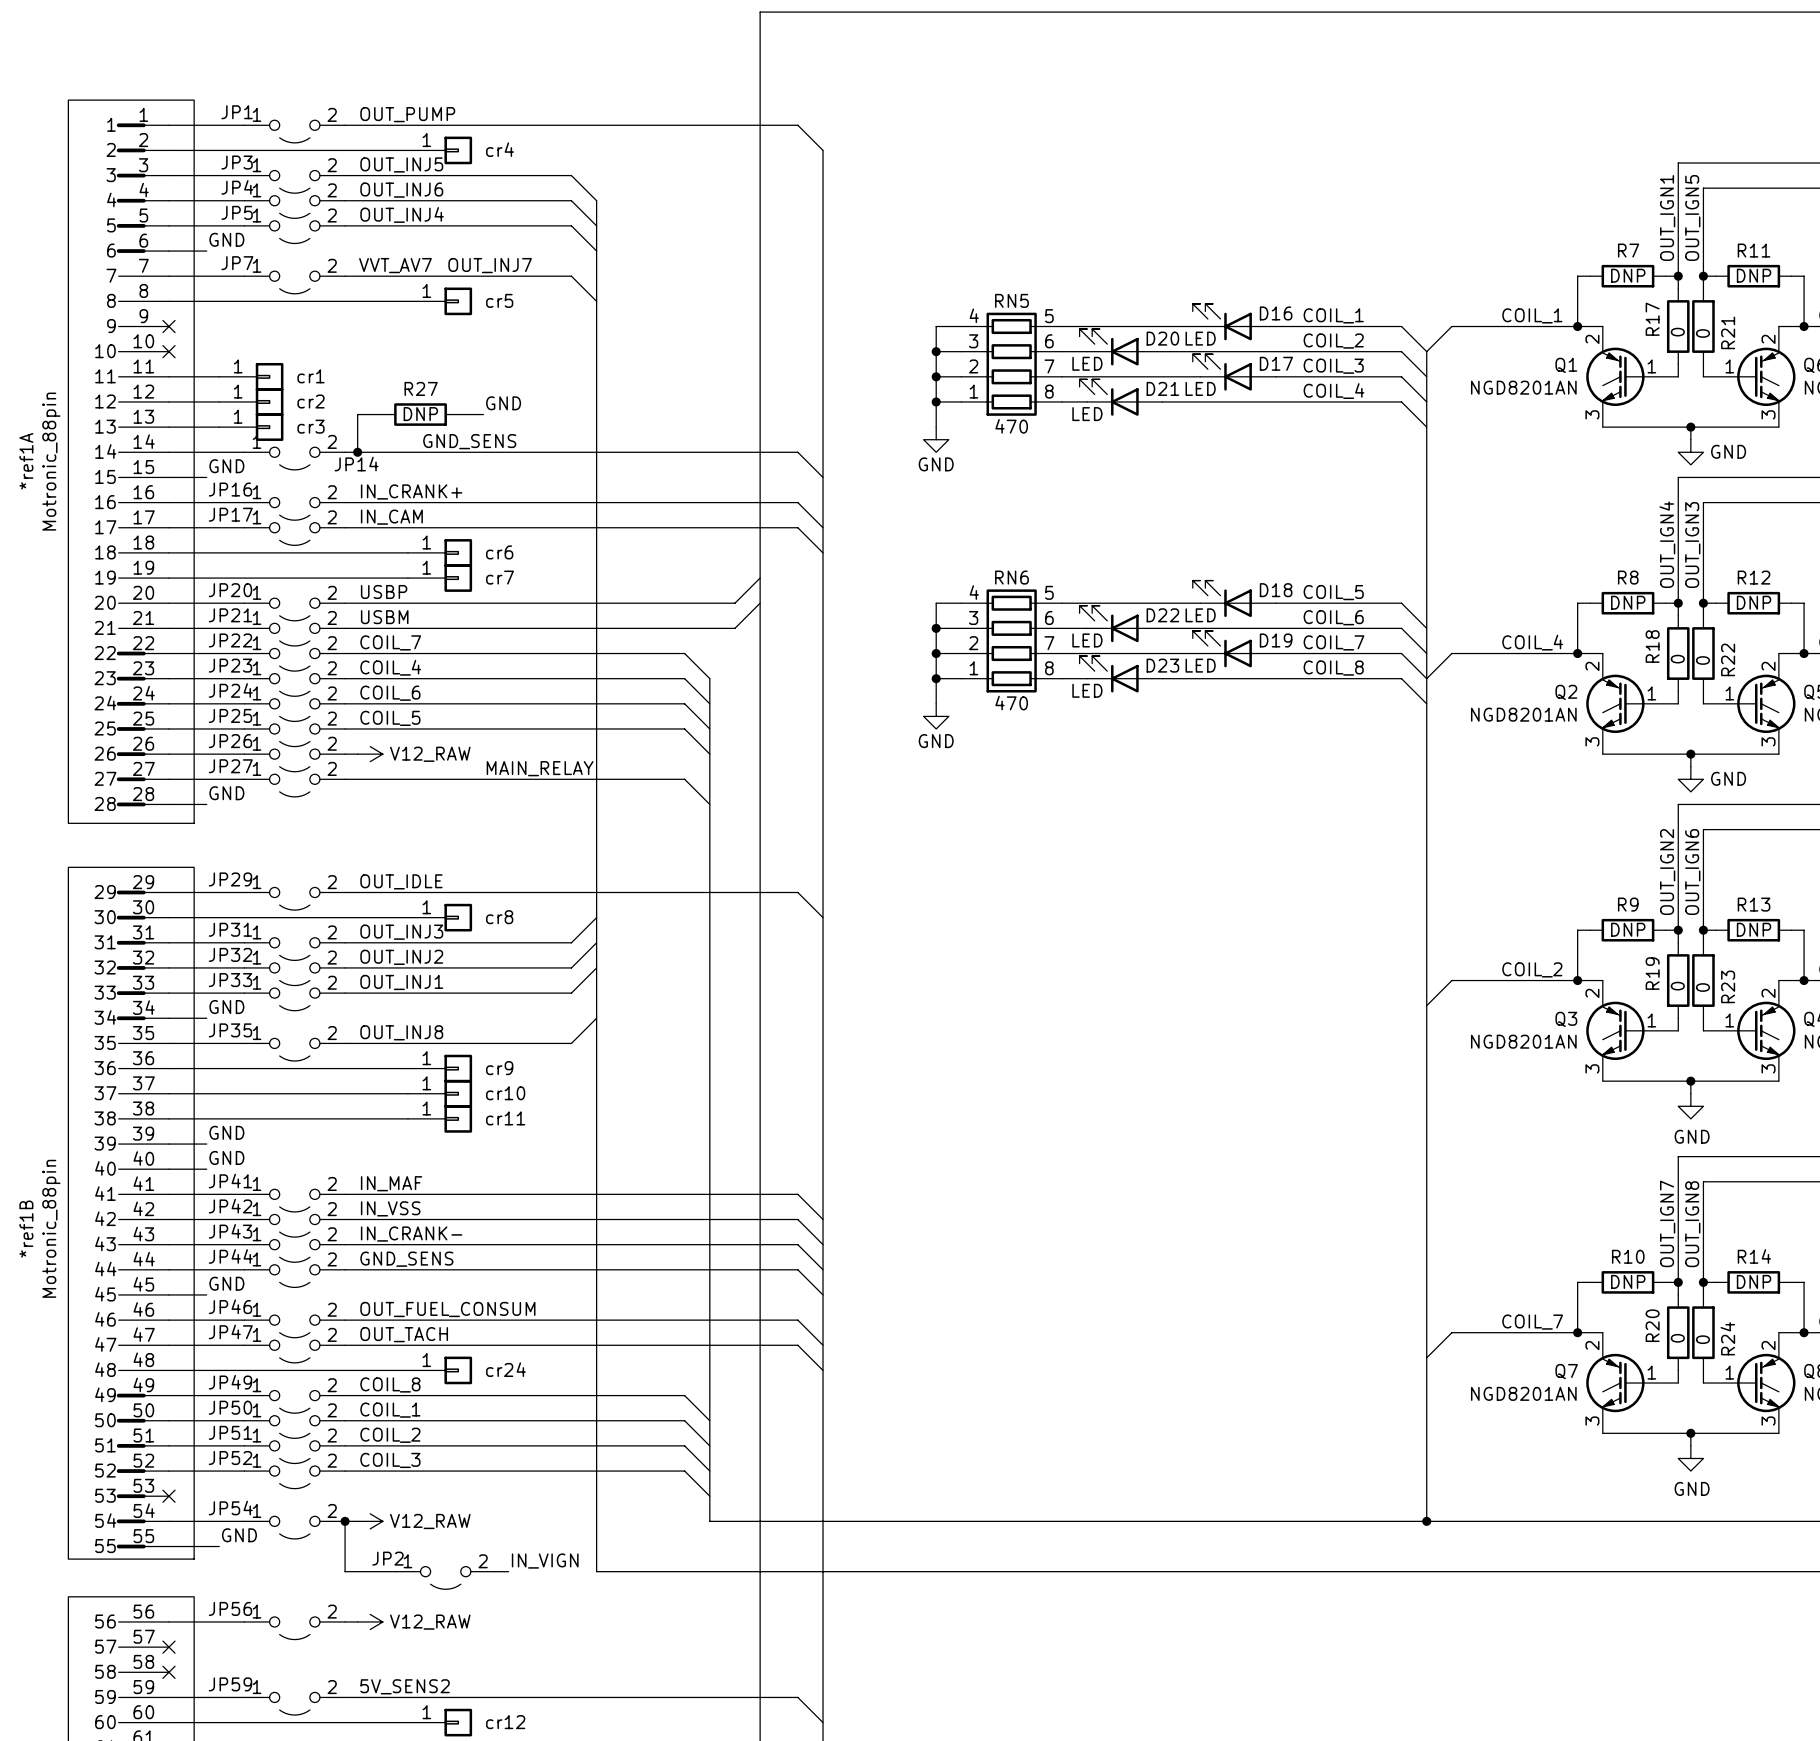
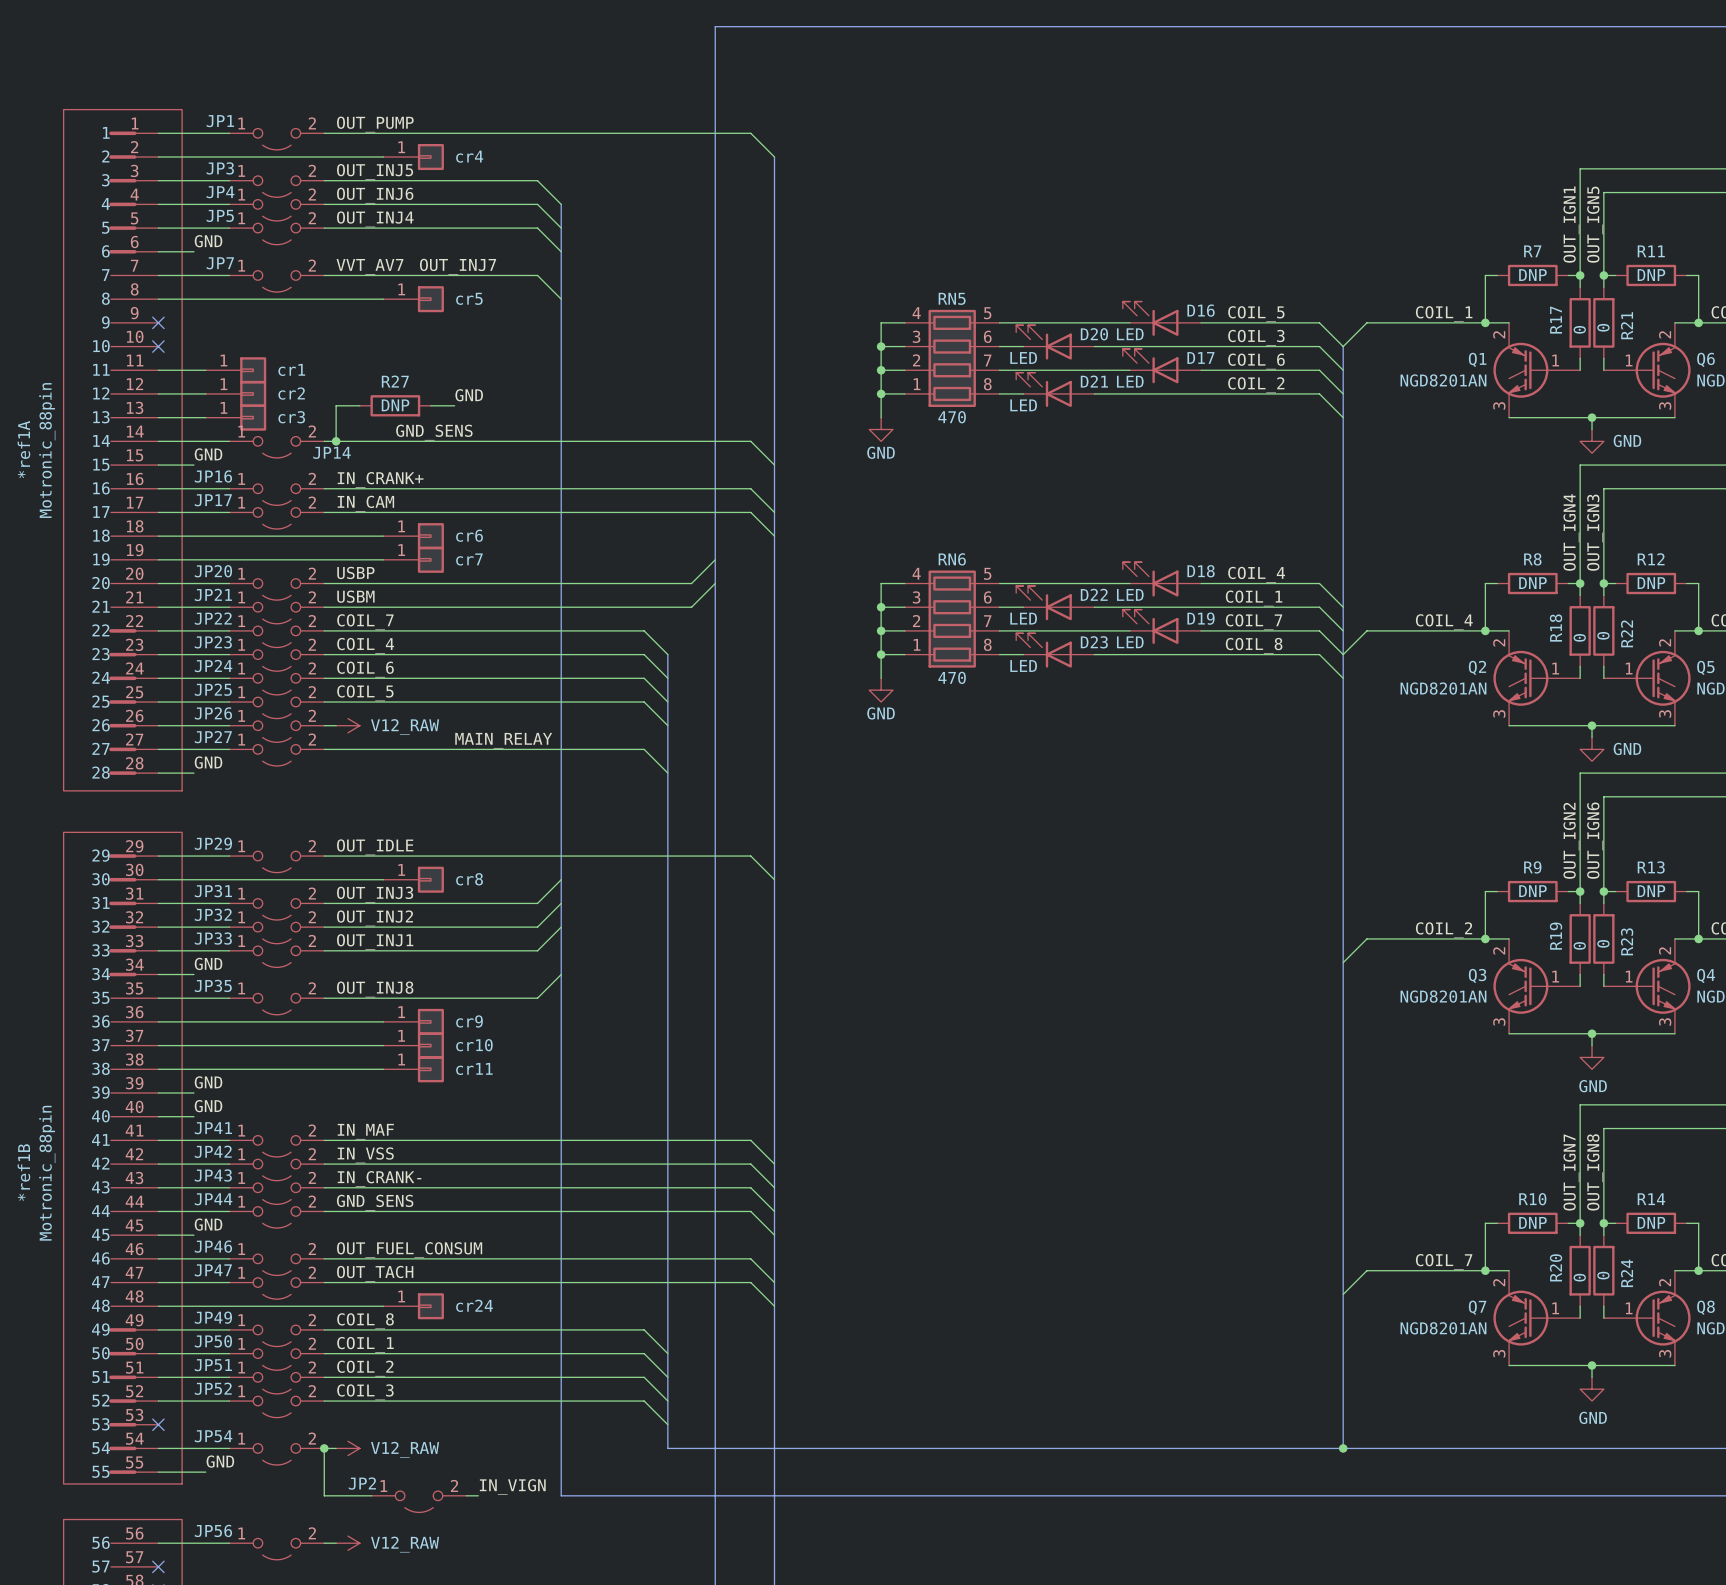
label: COIL_1 (1333, 315) -> COIL_5 (1256, 314)
label: COIL_2 (1333, 341) -> COIL_3 (1256, 337)
label: COIL_3 (1333, 366) -> COIL_6 (1256, 361)
label: COIL_4 (1333, 391) -> COIL_2 (1256, 385)
label: COIL_5 (1333, 592) -> COIL_4 (1256, 574)
label: COIL_6 (1333, 617) -> COIL_1 (1254, 598)

